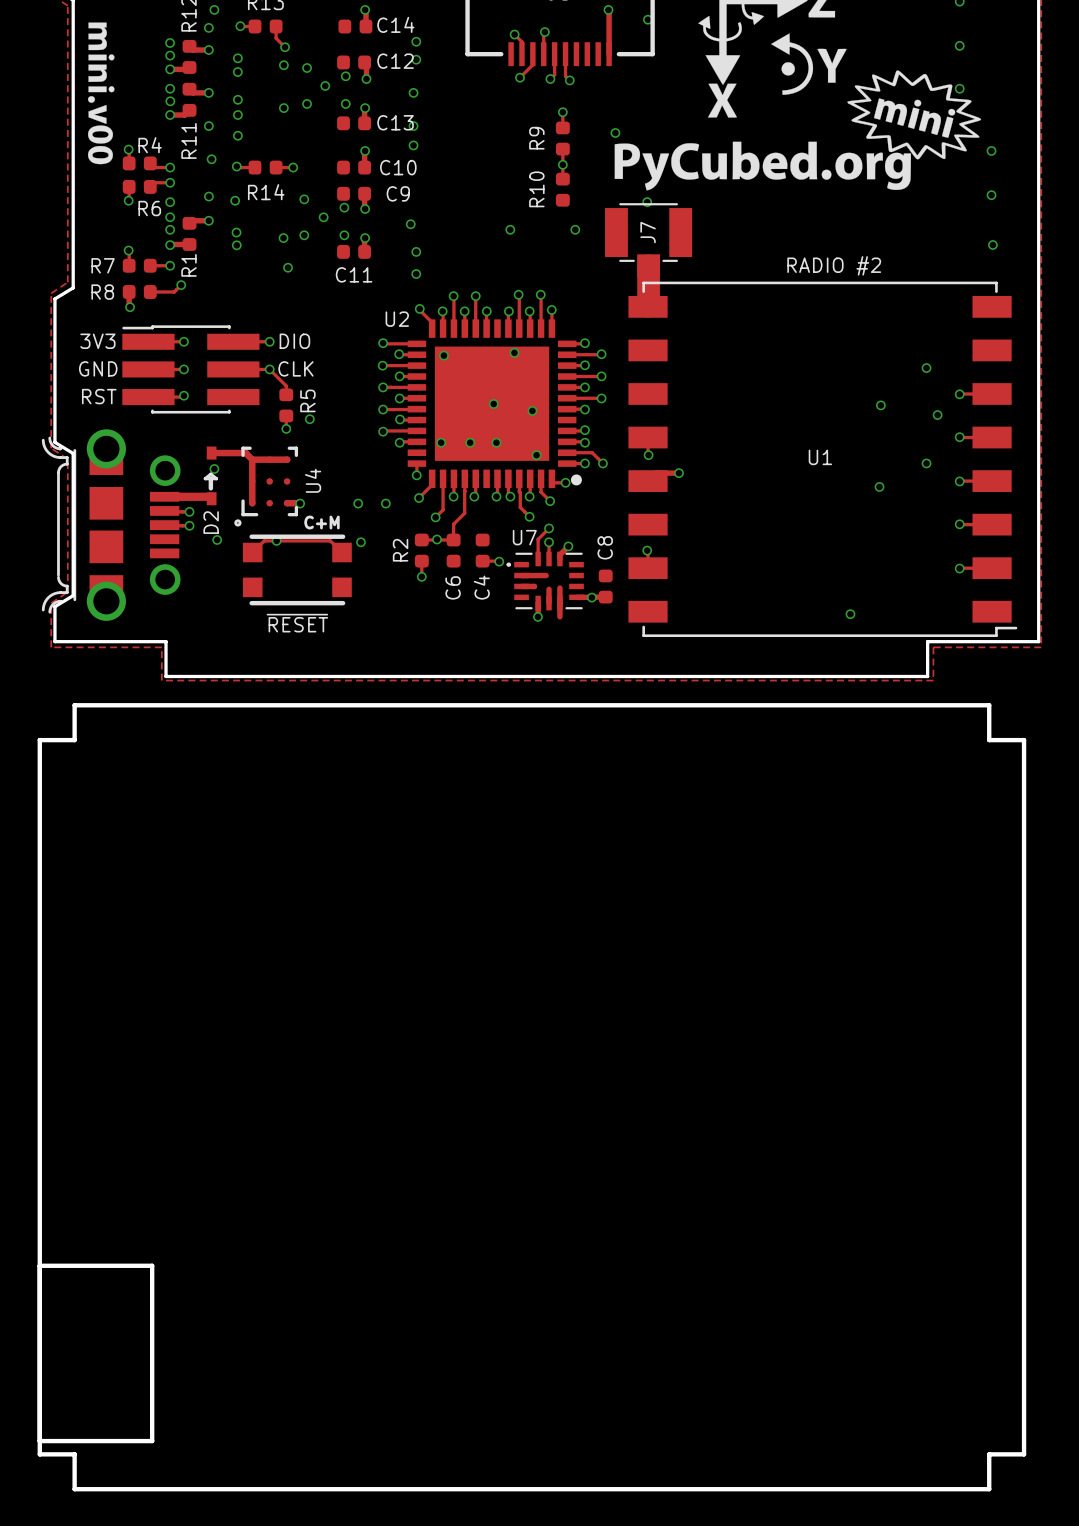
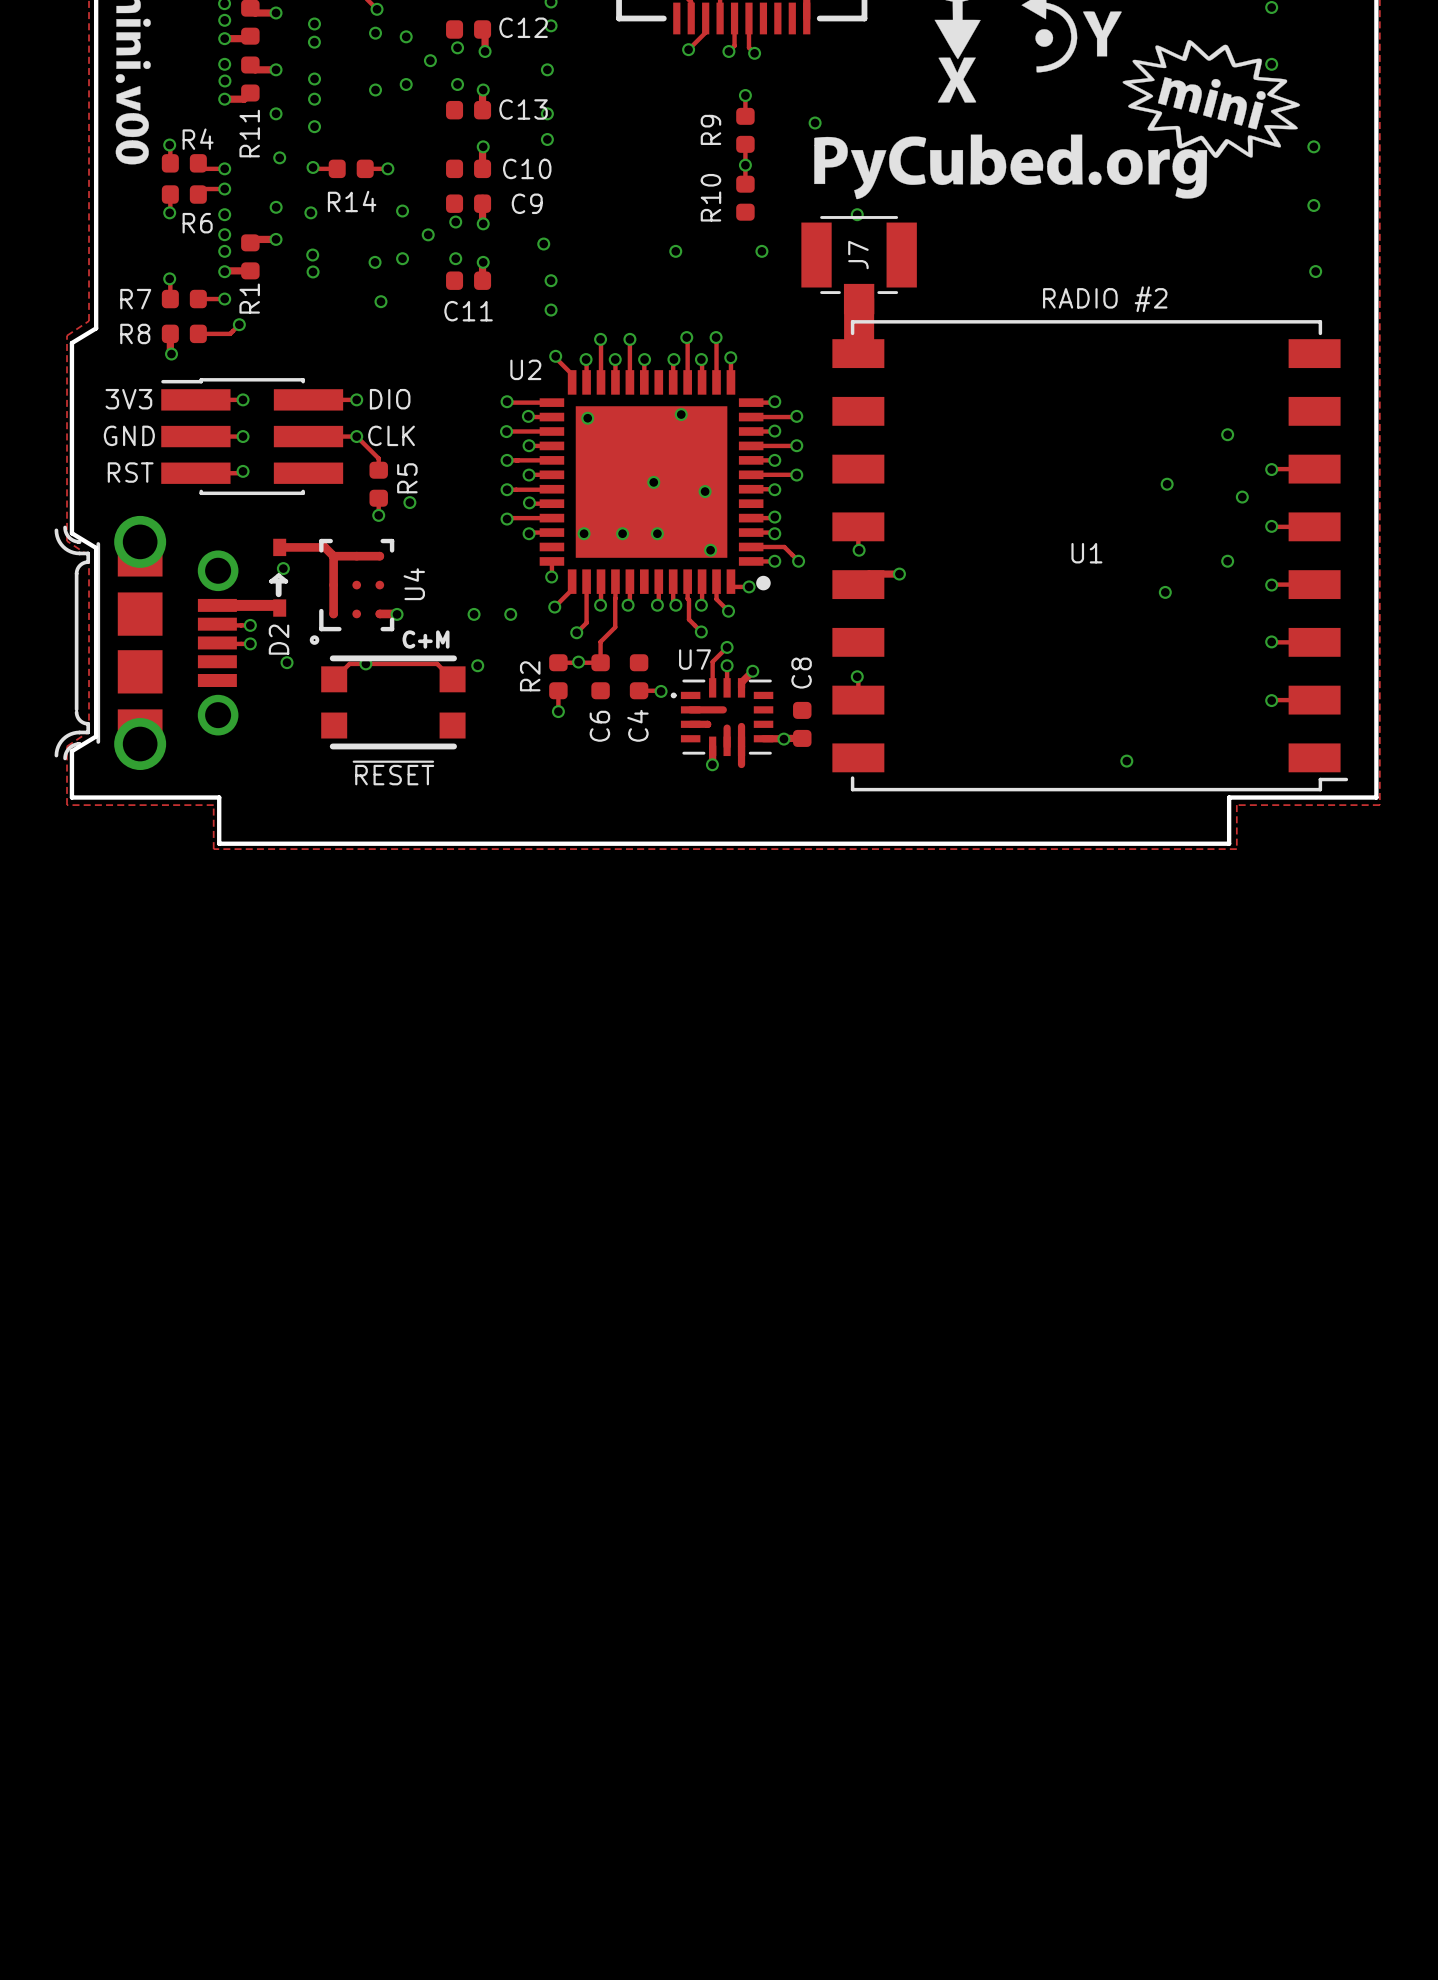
board edge: (74, 705) (989, 705) (989, 740) (1024, 740) (1024, 1454) (989, 1454) (989, 1489) (74, 1489) (74, 1454) (39, 1454) (39, 740) (74, 740) (74, 705) -> none
board edge: (39, 1265) (152, 1265) (152, 1441) (39, 1441) -> none

